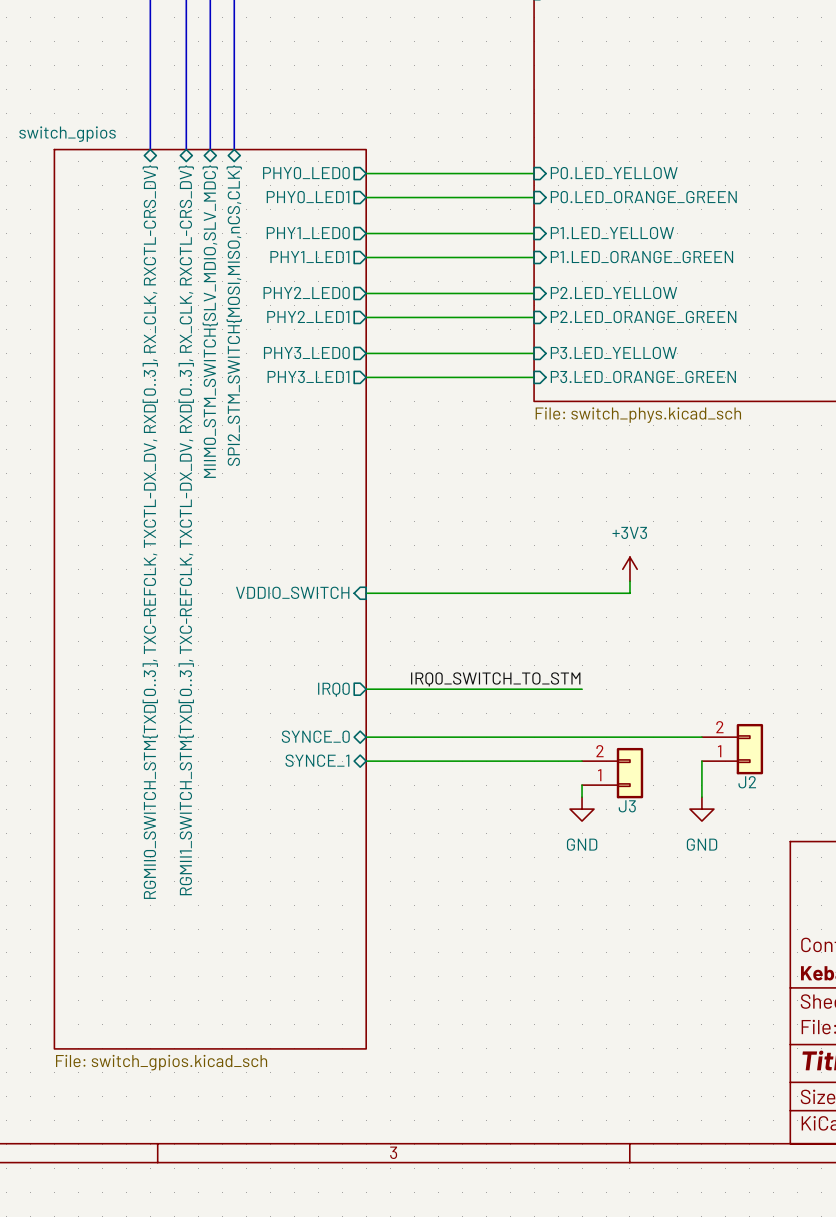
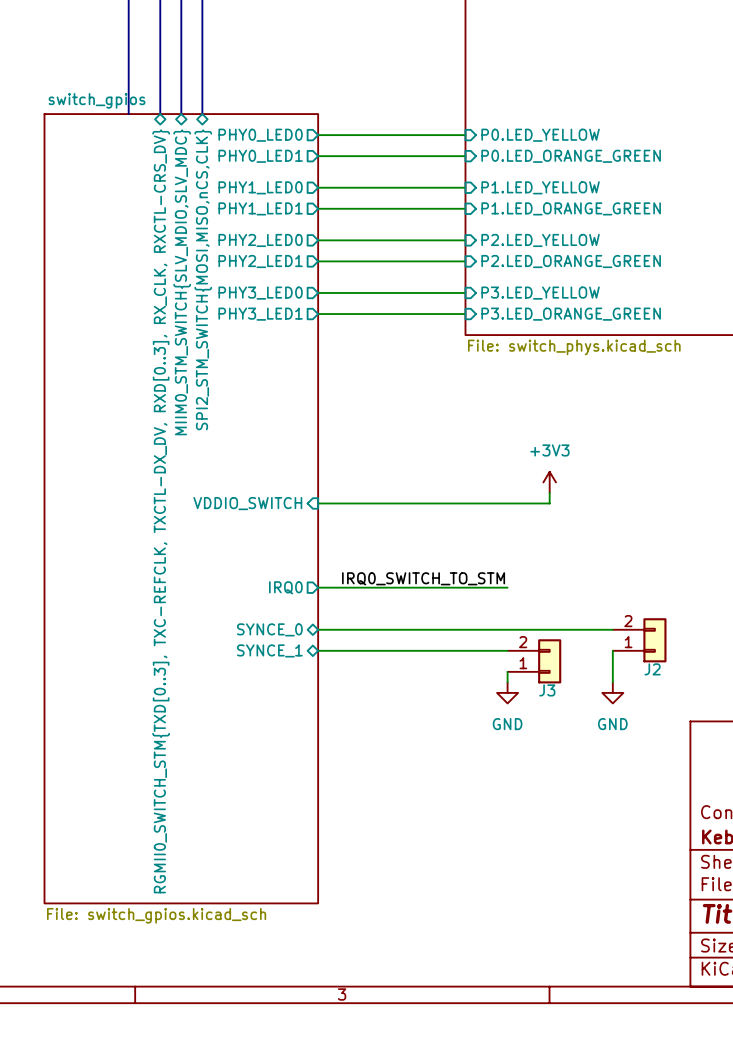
sheet switch_gpios name position: switch_gpios (67, 134) -> switch_gpios (97, 100)
sheet pin: RGMII1_SWITCH_STM{TXD[0..3], TXC-REFCLK, TXCTL-DX_DV, RXD[0..3], RX_CLK, RXCTL-CRS_DV} (186, 530) -> RGMII0_SWITCH_STM{TXD[0..3], TXC-REFCLK, TXCTL-DX_DV, RXD[0..3], RX_CLK, RXCTL-CRS_DV} (161, 511)
sheet pin: RGMII0_SWITCH_STM{TXD[0..3], TXC-REFCLK, TXCTL-DX_DV, RXD[0..3], RX_CLK, RXCTL-CRS_DV} (150, 532) -> none

